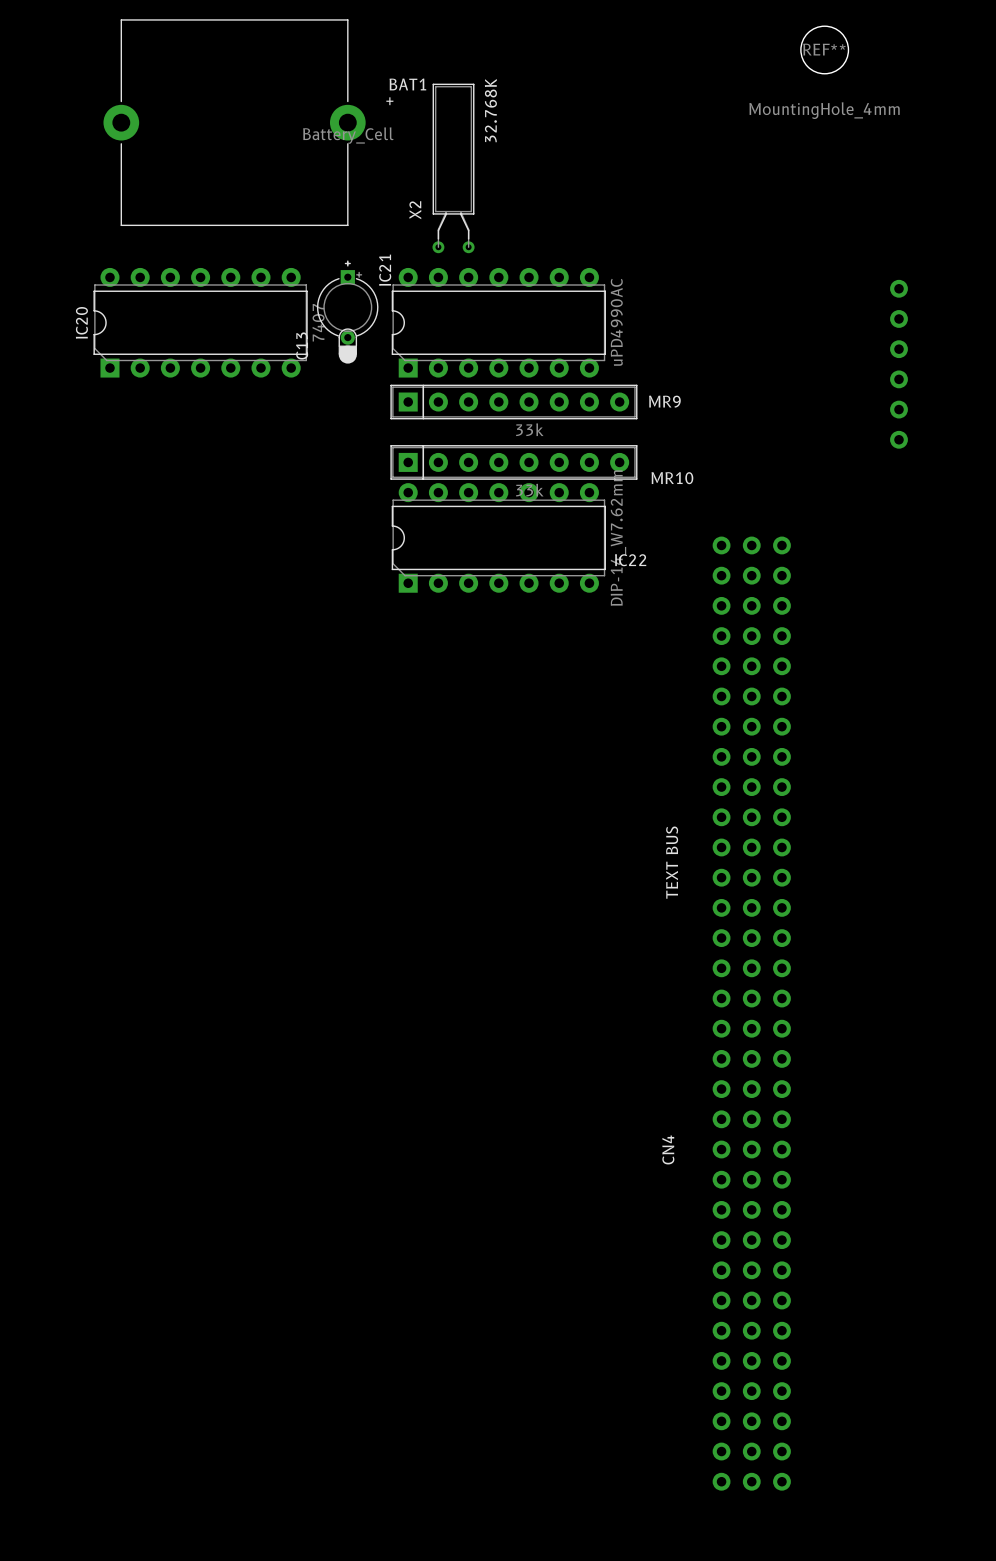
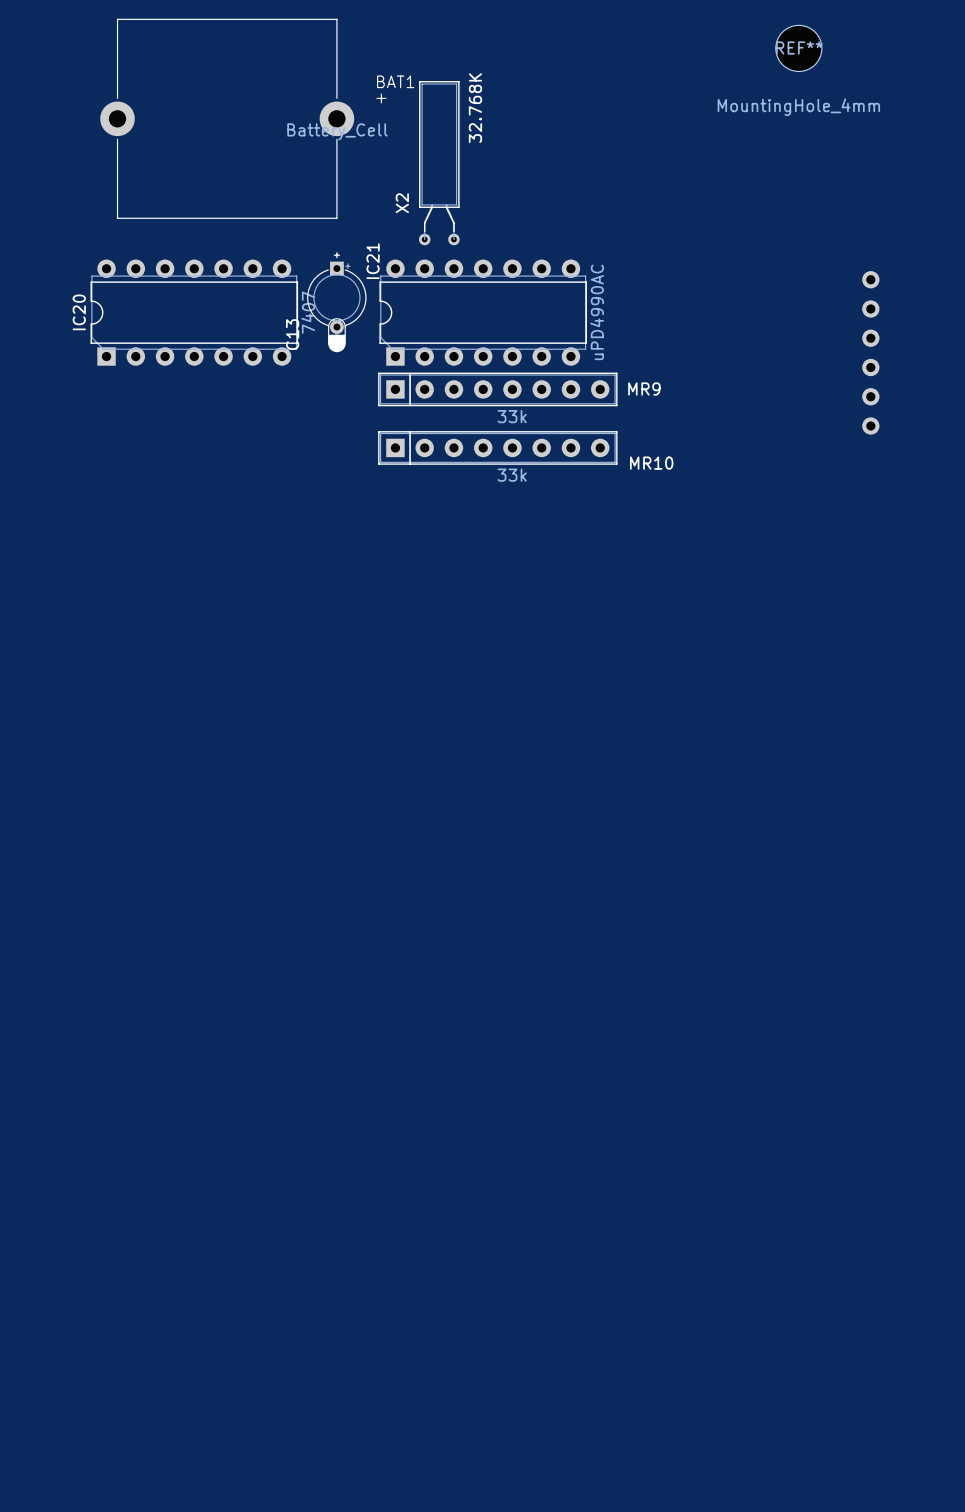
IC22: DIP-14_W7.62mm (498, 537) -> none
CN4: TEXT BUS (751, 1013) -> none

